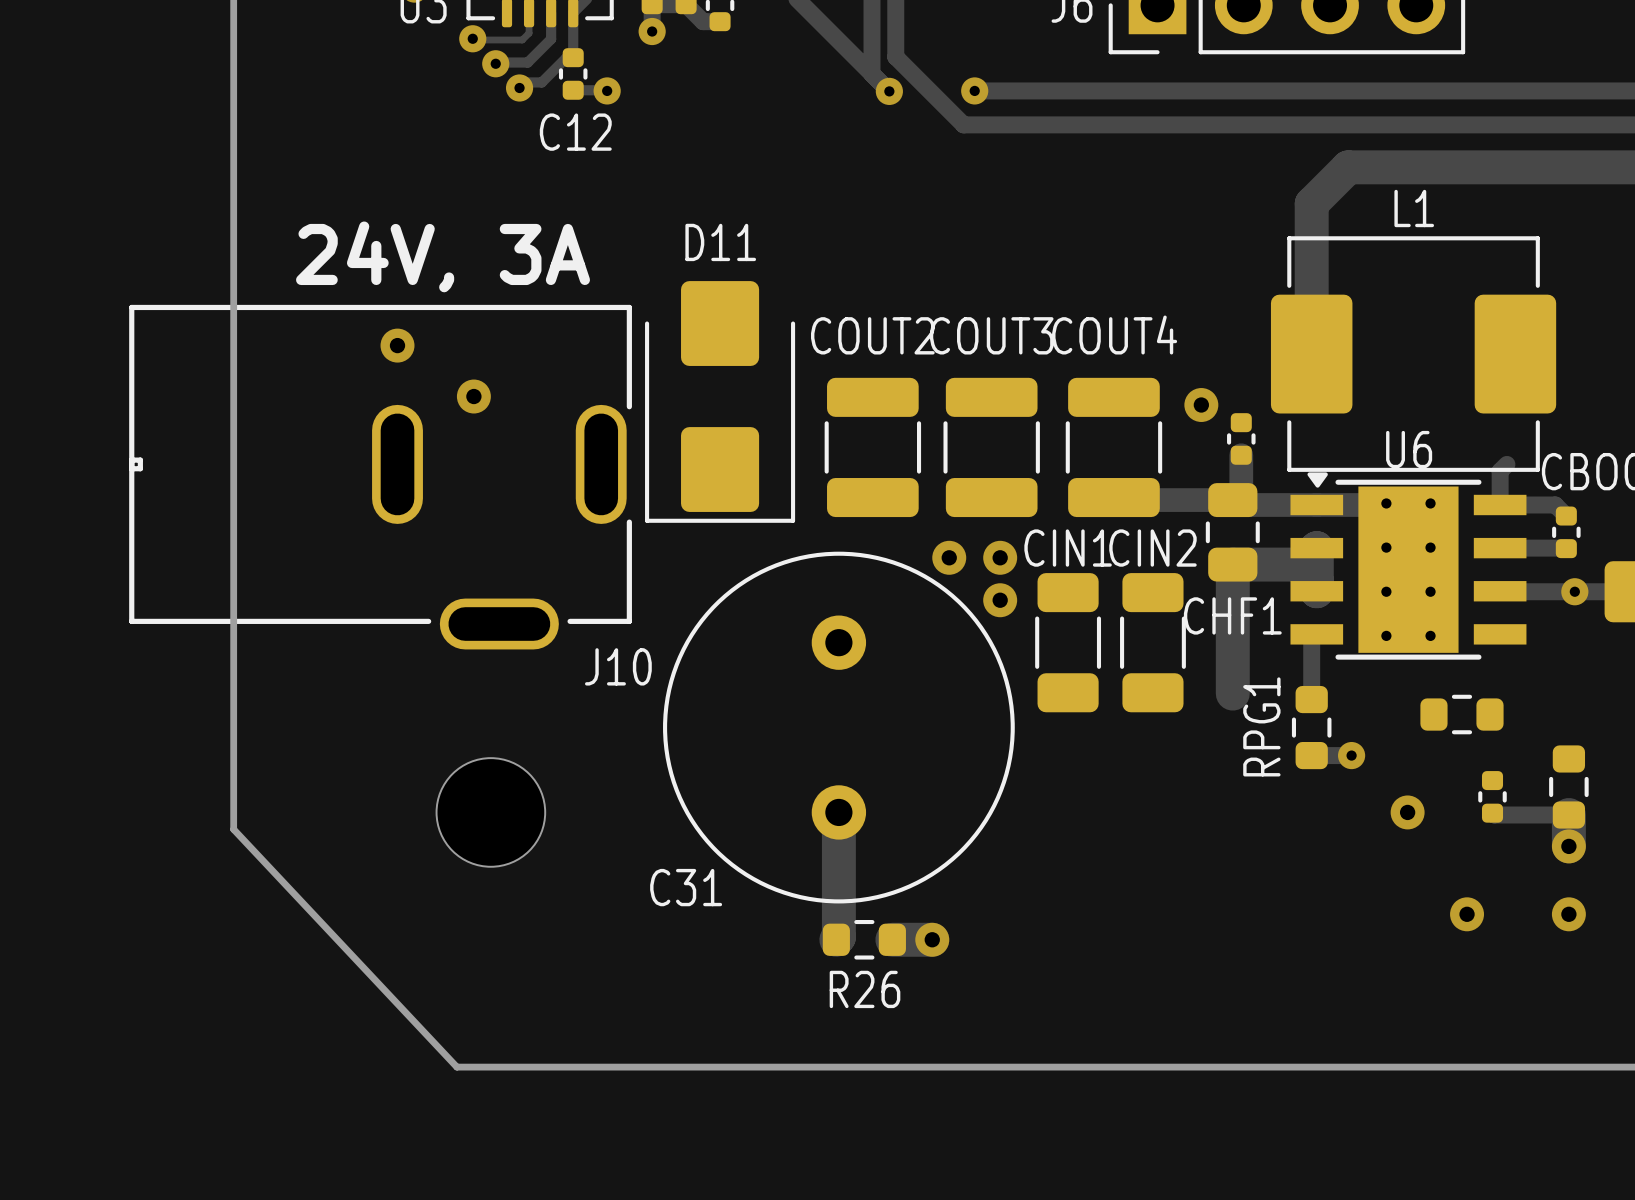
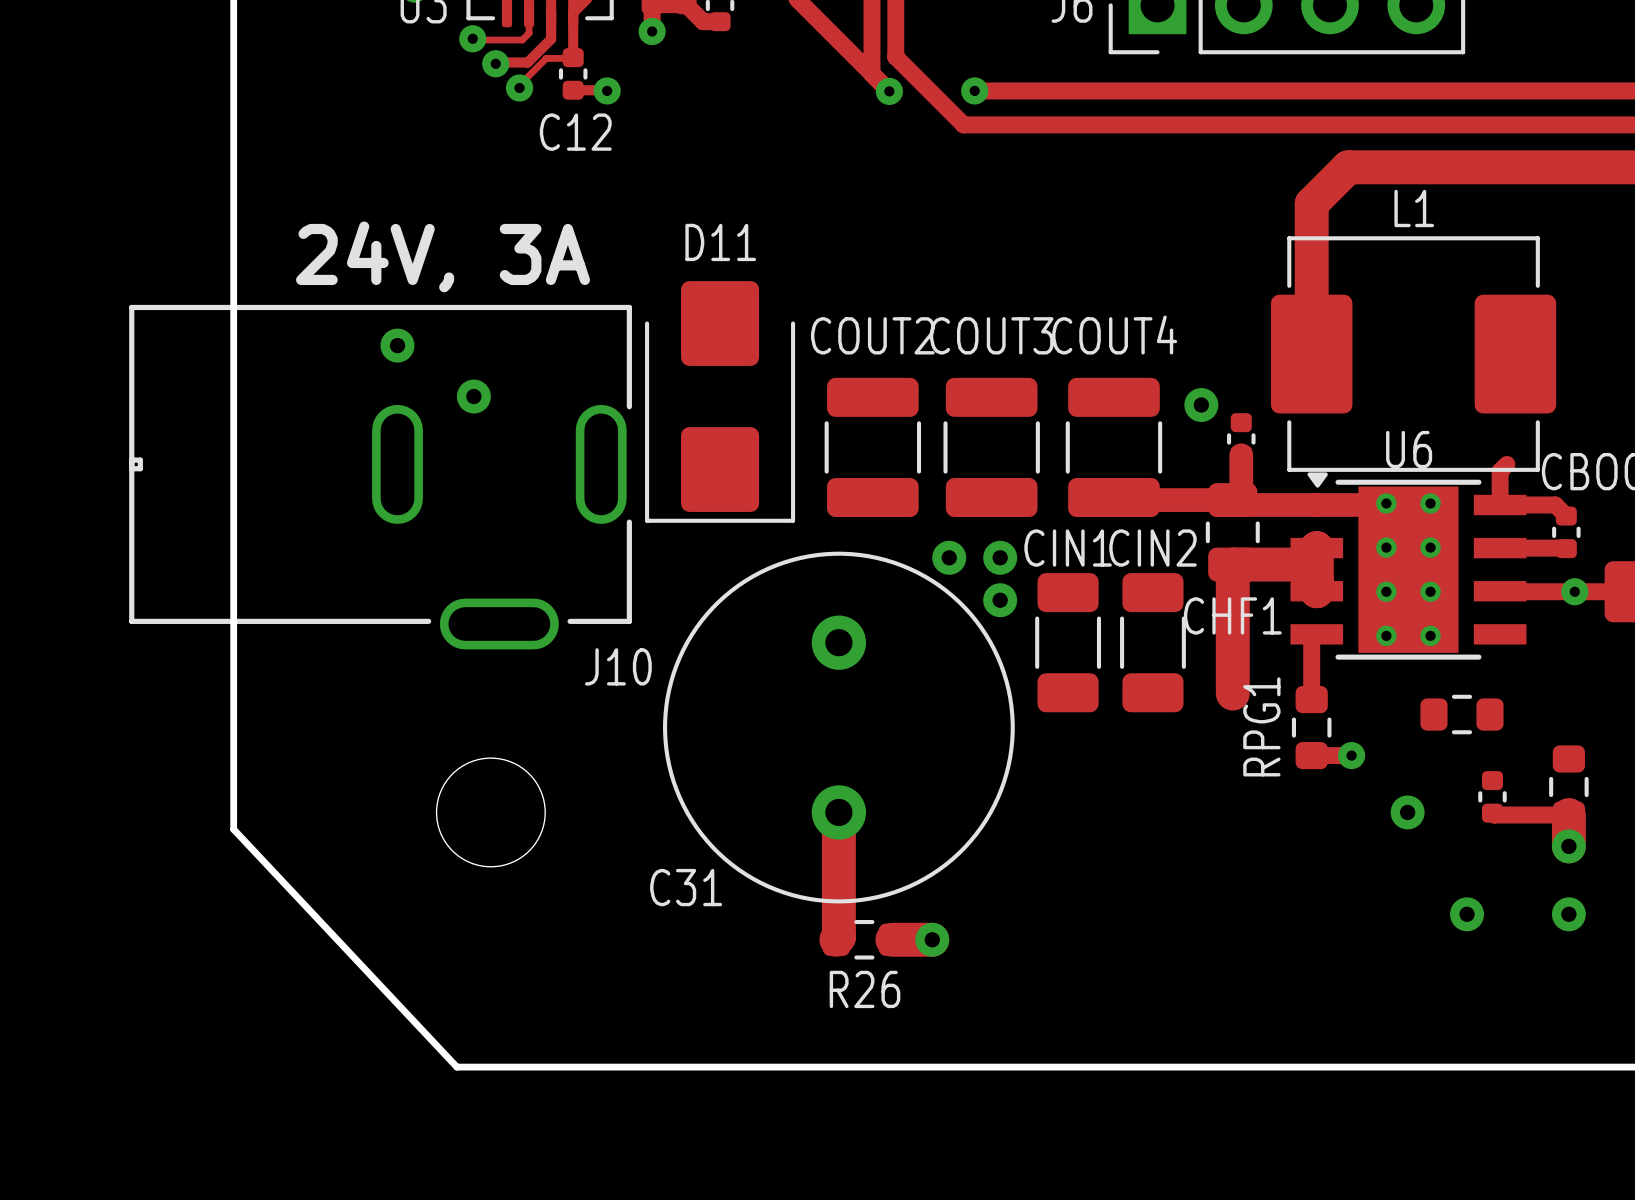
track: (565, 58) (541, 82) (522, 82) -> (565, 58) (546, 58) (522, 82)

